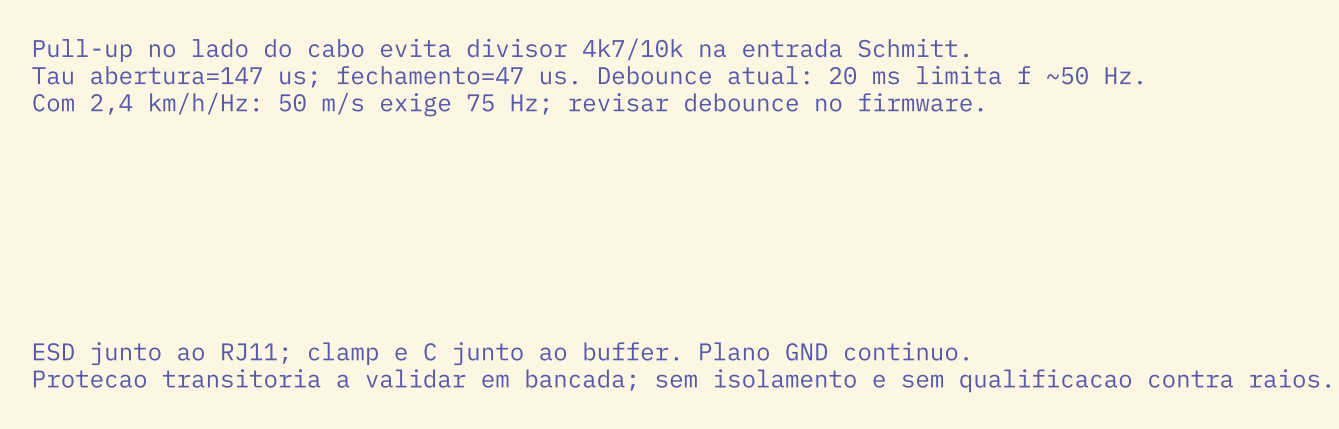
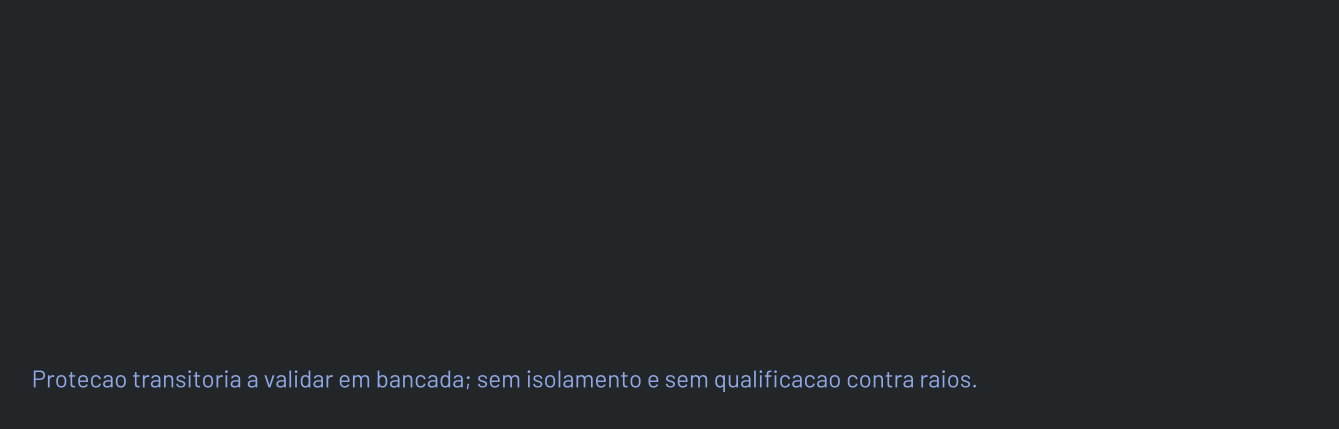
text: Pull-up no lado do cabo evita divisor 4k7/10k na entrada Schmitt. (500, 50) -> none
text: Tau abertura=147 us; fechamento=47 us. Debounce atual: 20 ms limita f ~50 Hz. (587, 76) -> none
text: Com 2,4 km/h/Hz: 50 m/s exige 75 Hz; revisar debounce no firmware. (507, 104) -> none
text: ESD junto ao RJ11; clamp e C junto ao buffer. Plano GND continuo. (500, 353) -> none

